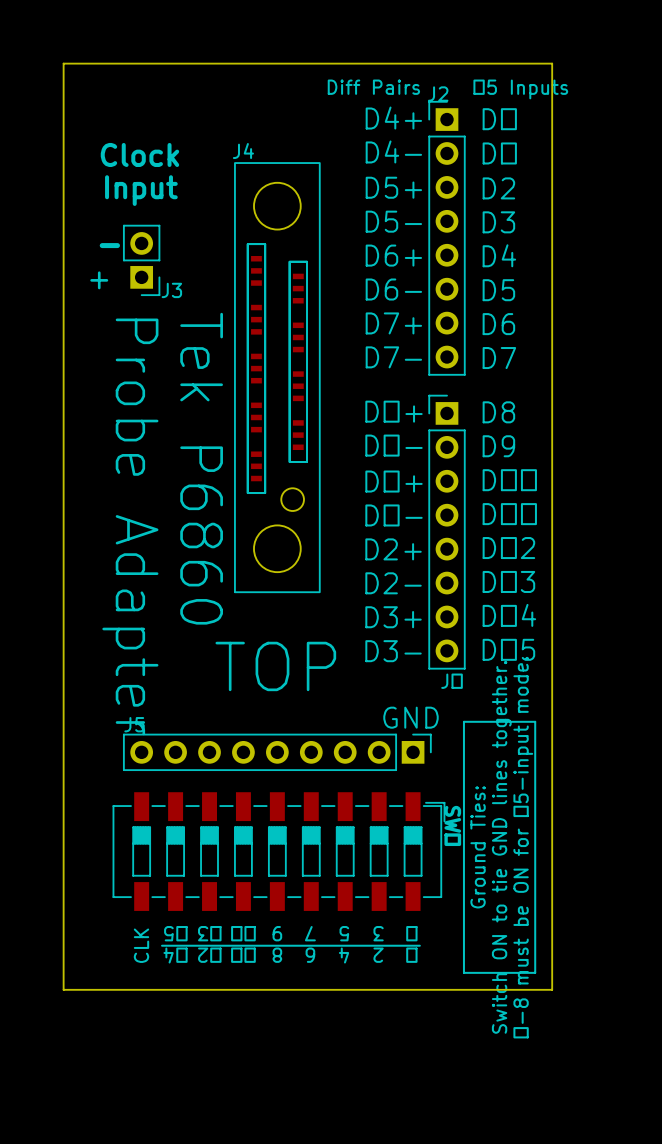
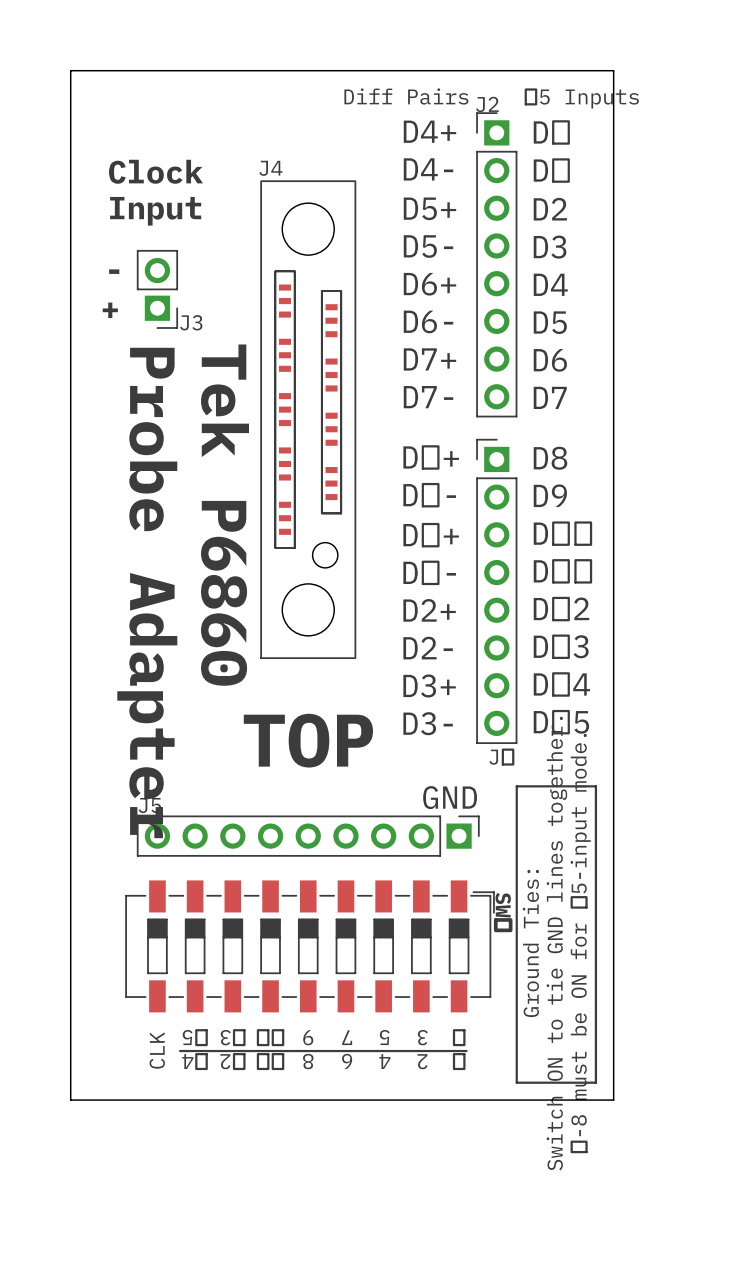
line: (463, 721) (535, 721) (535, 972) (463, 972) (463, 721) -> (516, 786) (516, 1082) (595, 1082) (595, 786) (516, 786)

